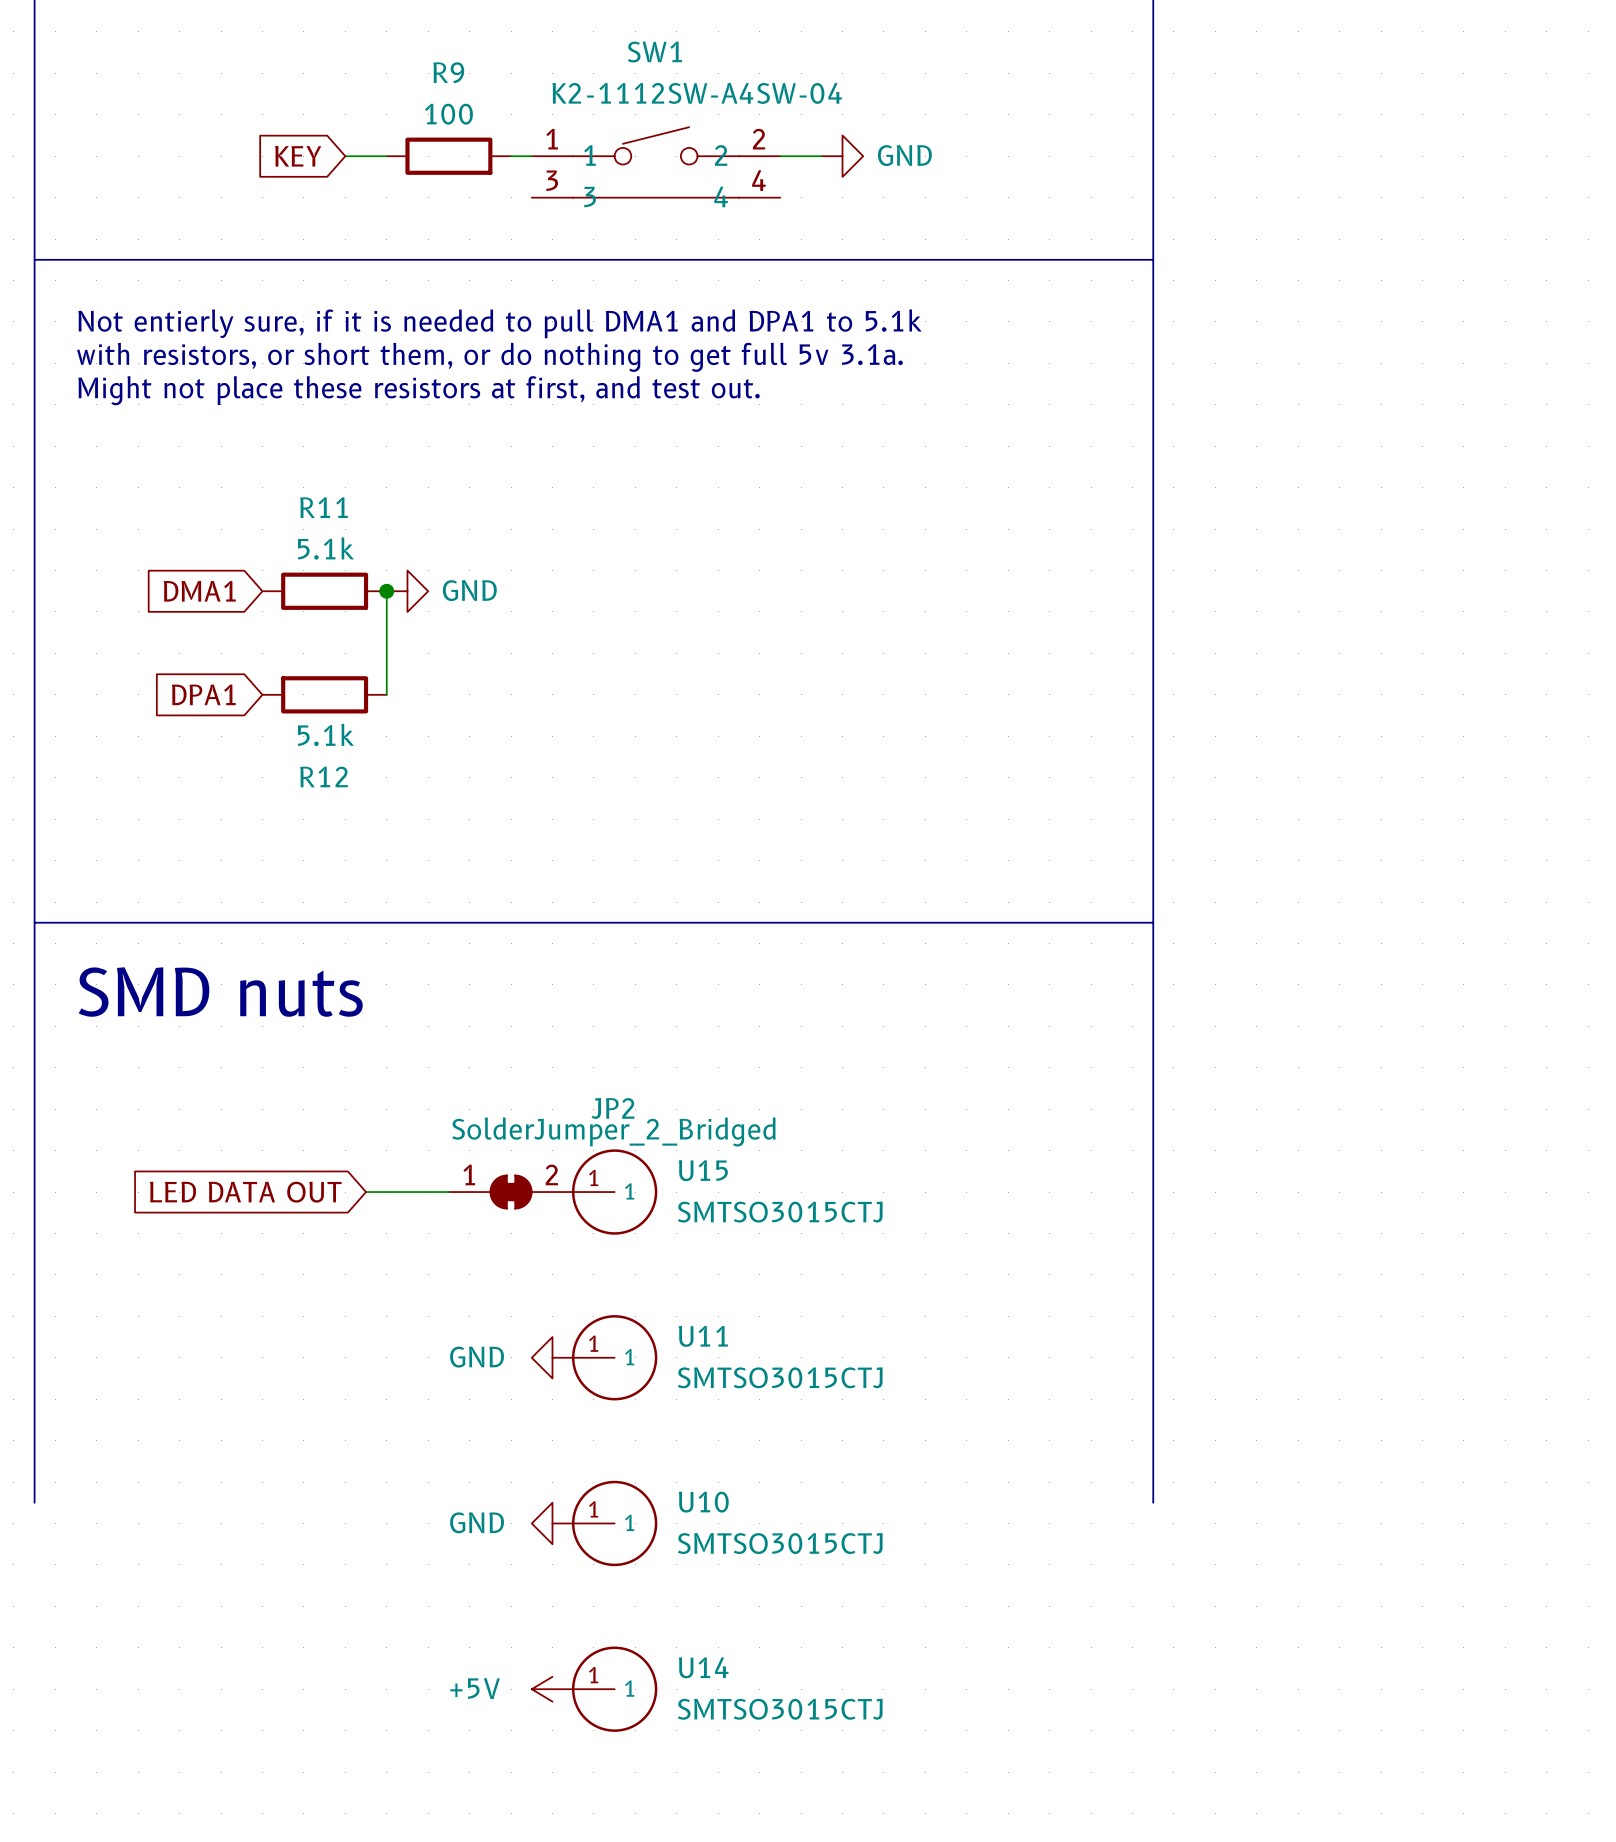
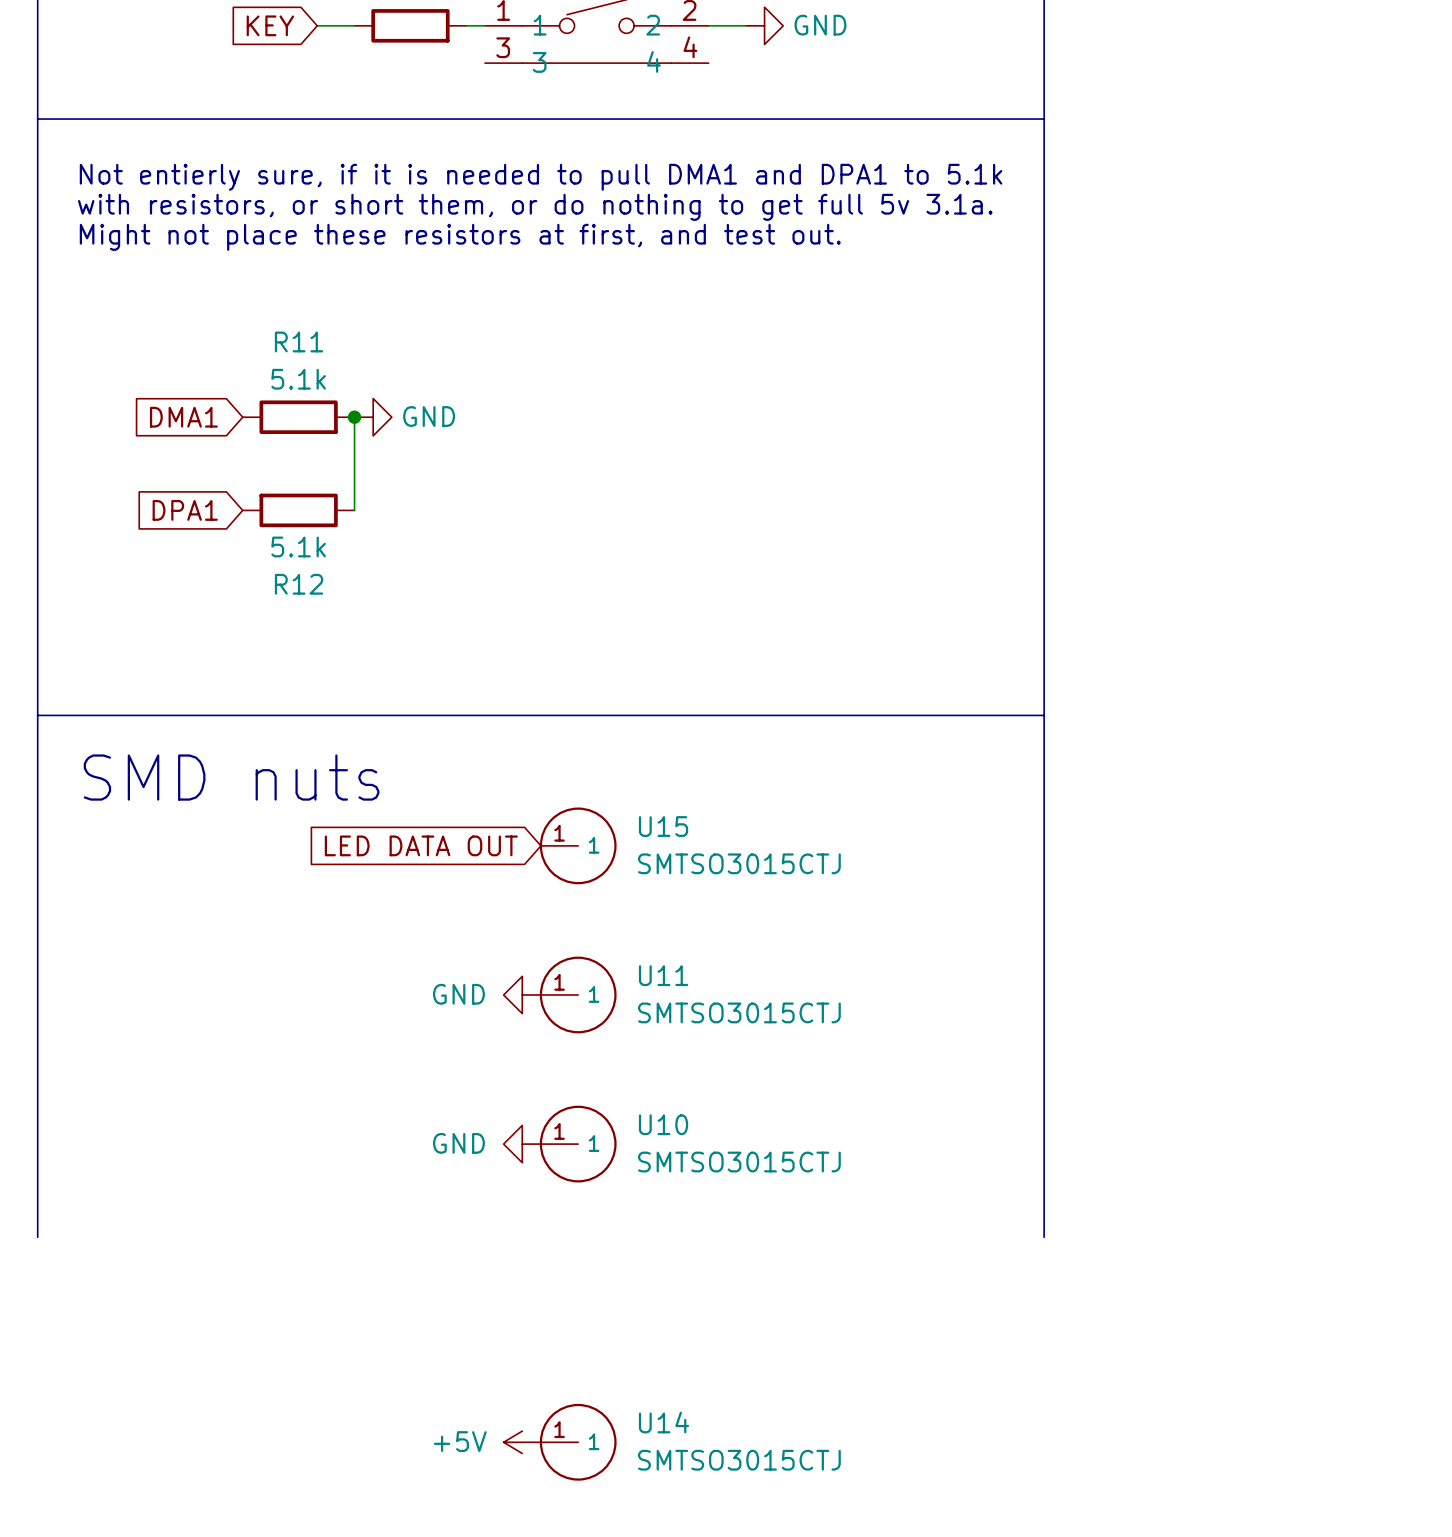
global label position: LED DATA OUT (245, 1192) -> LED DATA OUT (421, 845)
wire: (366, 1192) (448, 1192) -> none
JP2: SolderJumper_2_Bridged (511, 1192) -> none
U15 position: (614, 1192) -> (578, 845)
power symbol: none -> GND (522, 994)
power symbol position: GND (552, 1357) -> GND (522, 1144)
U11 position: (614, 1357) -> (578, 994)
power symbol: GND (552, 1523) -> none
U10 position: (614, 1523) -> (578, 1144)
power symbol position: +5V (552, 1689) -> +5V (522, 1442)
U14 position: (614, 1689) -> (578, 1442)

